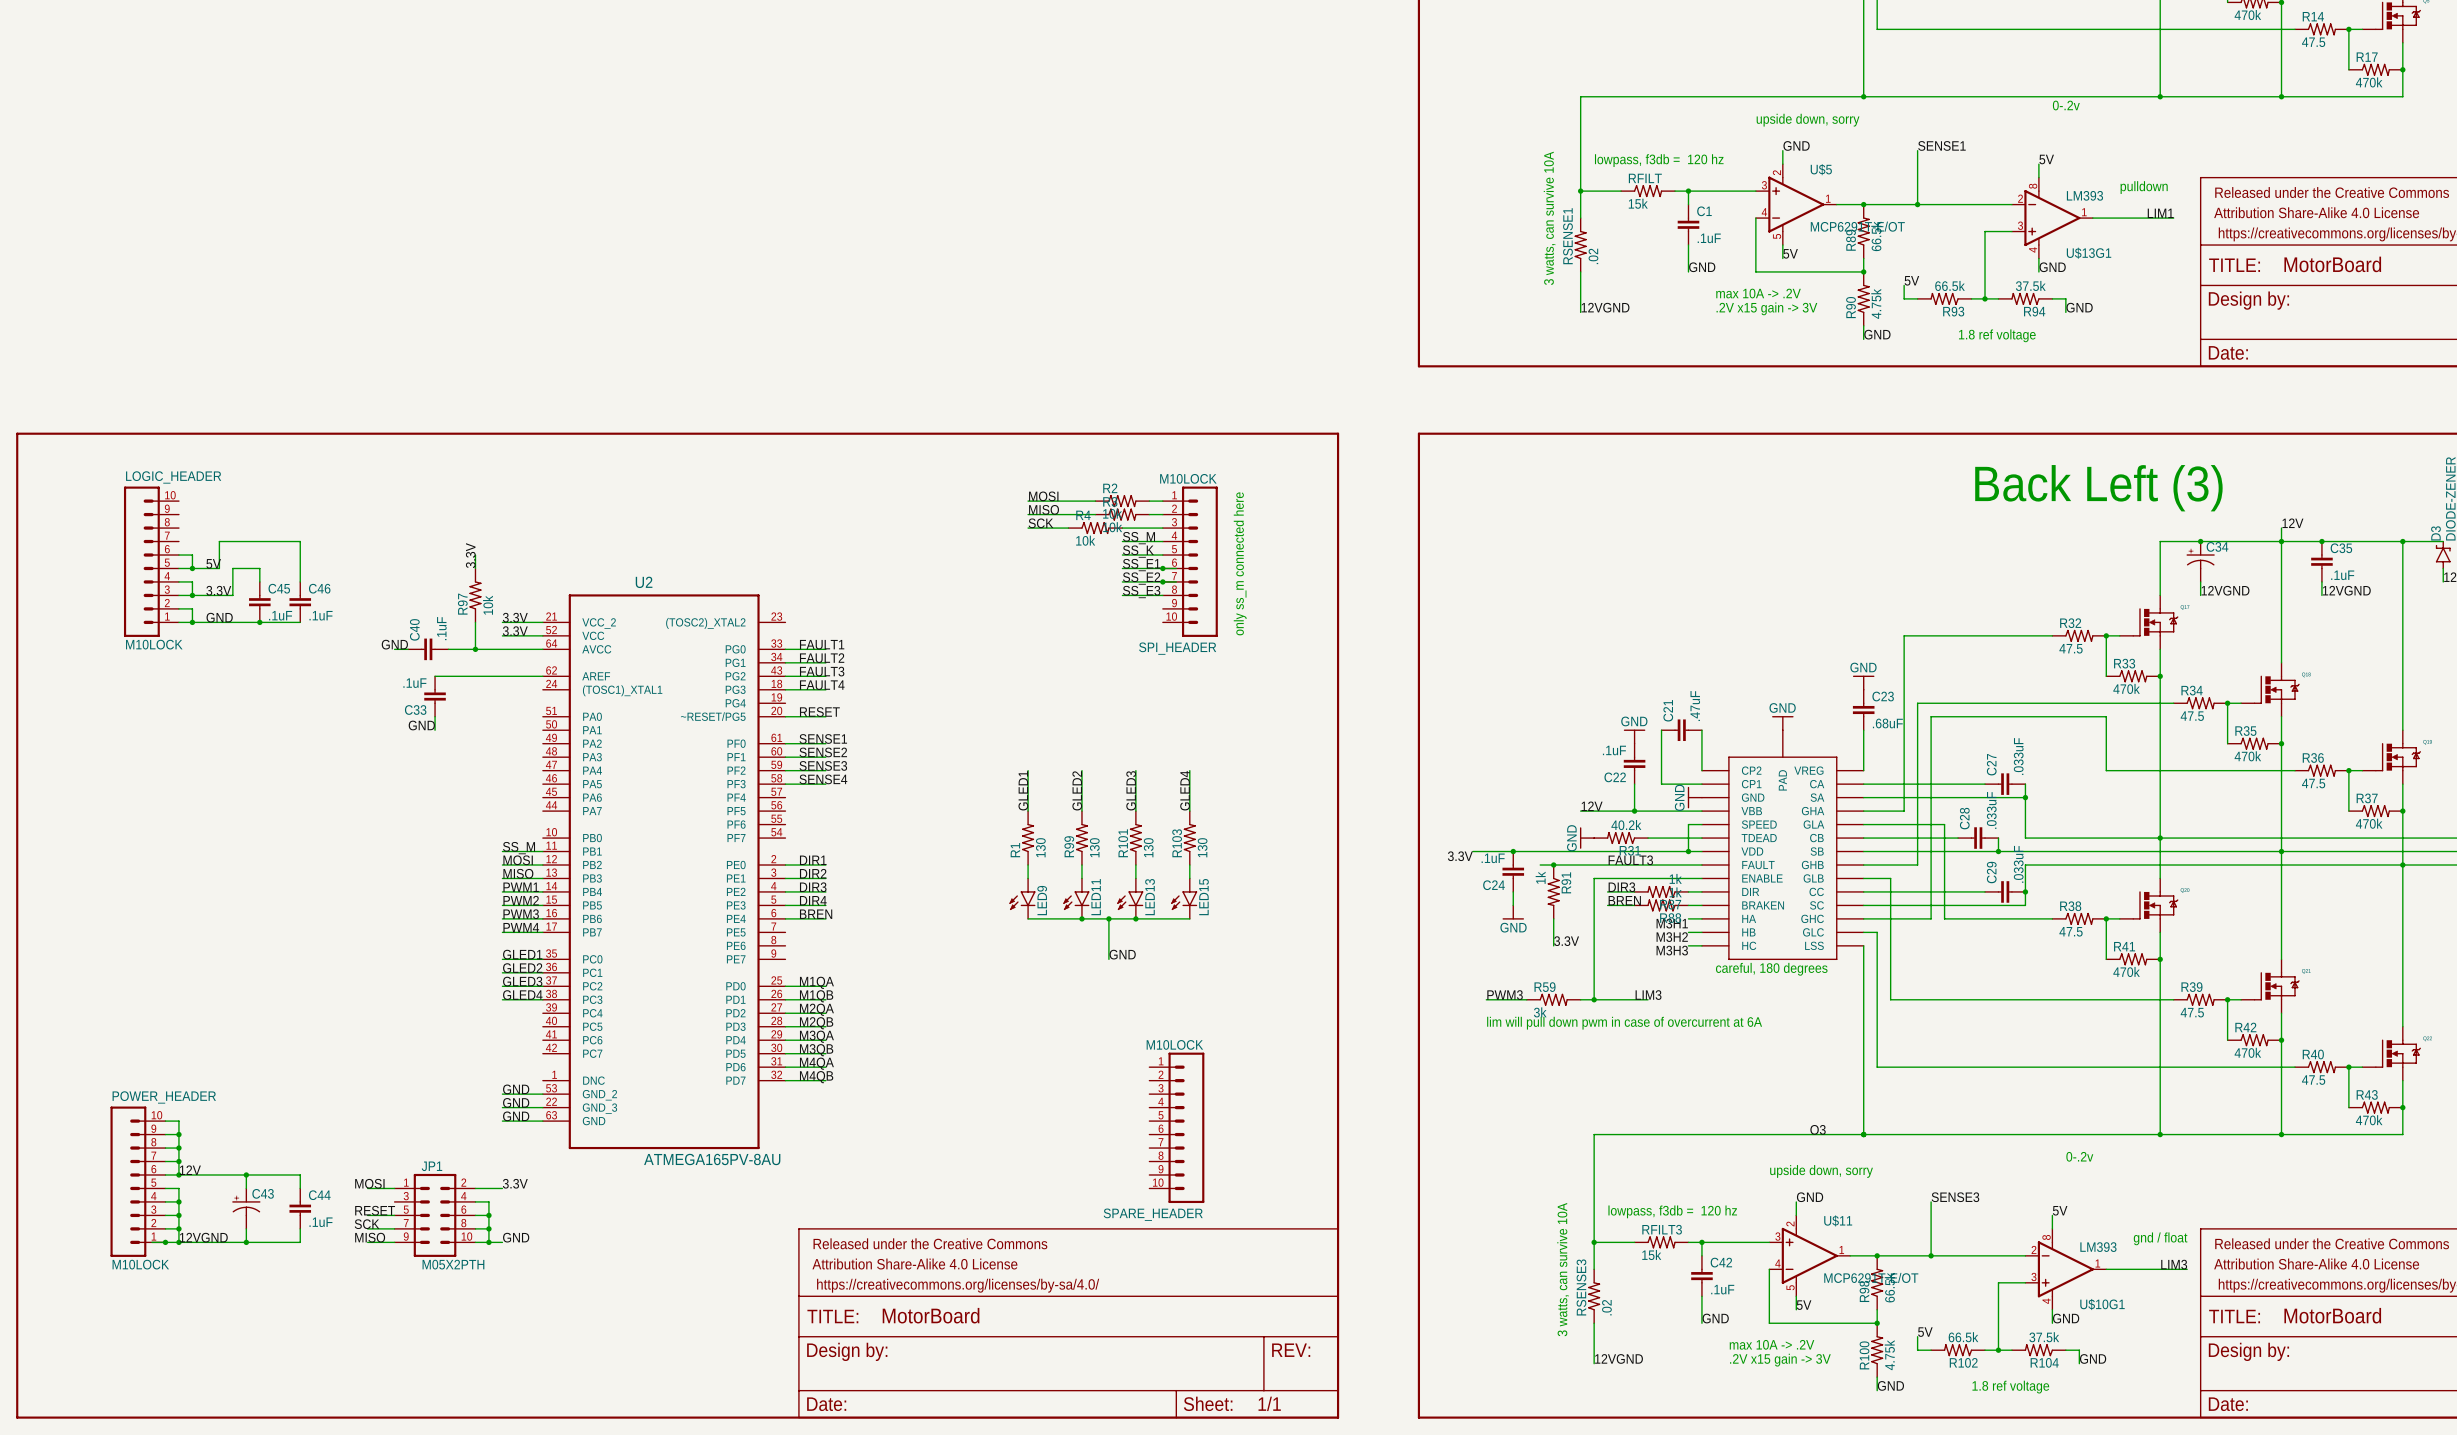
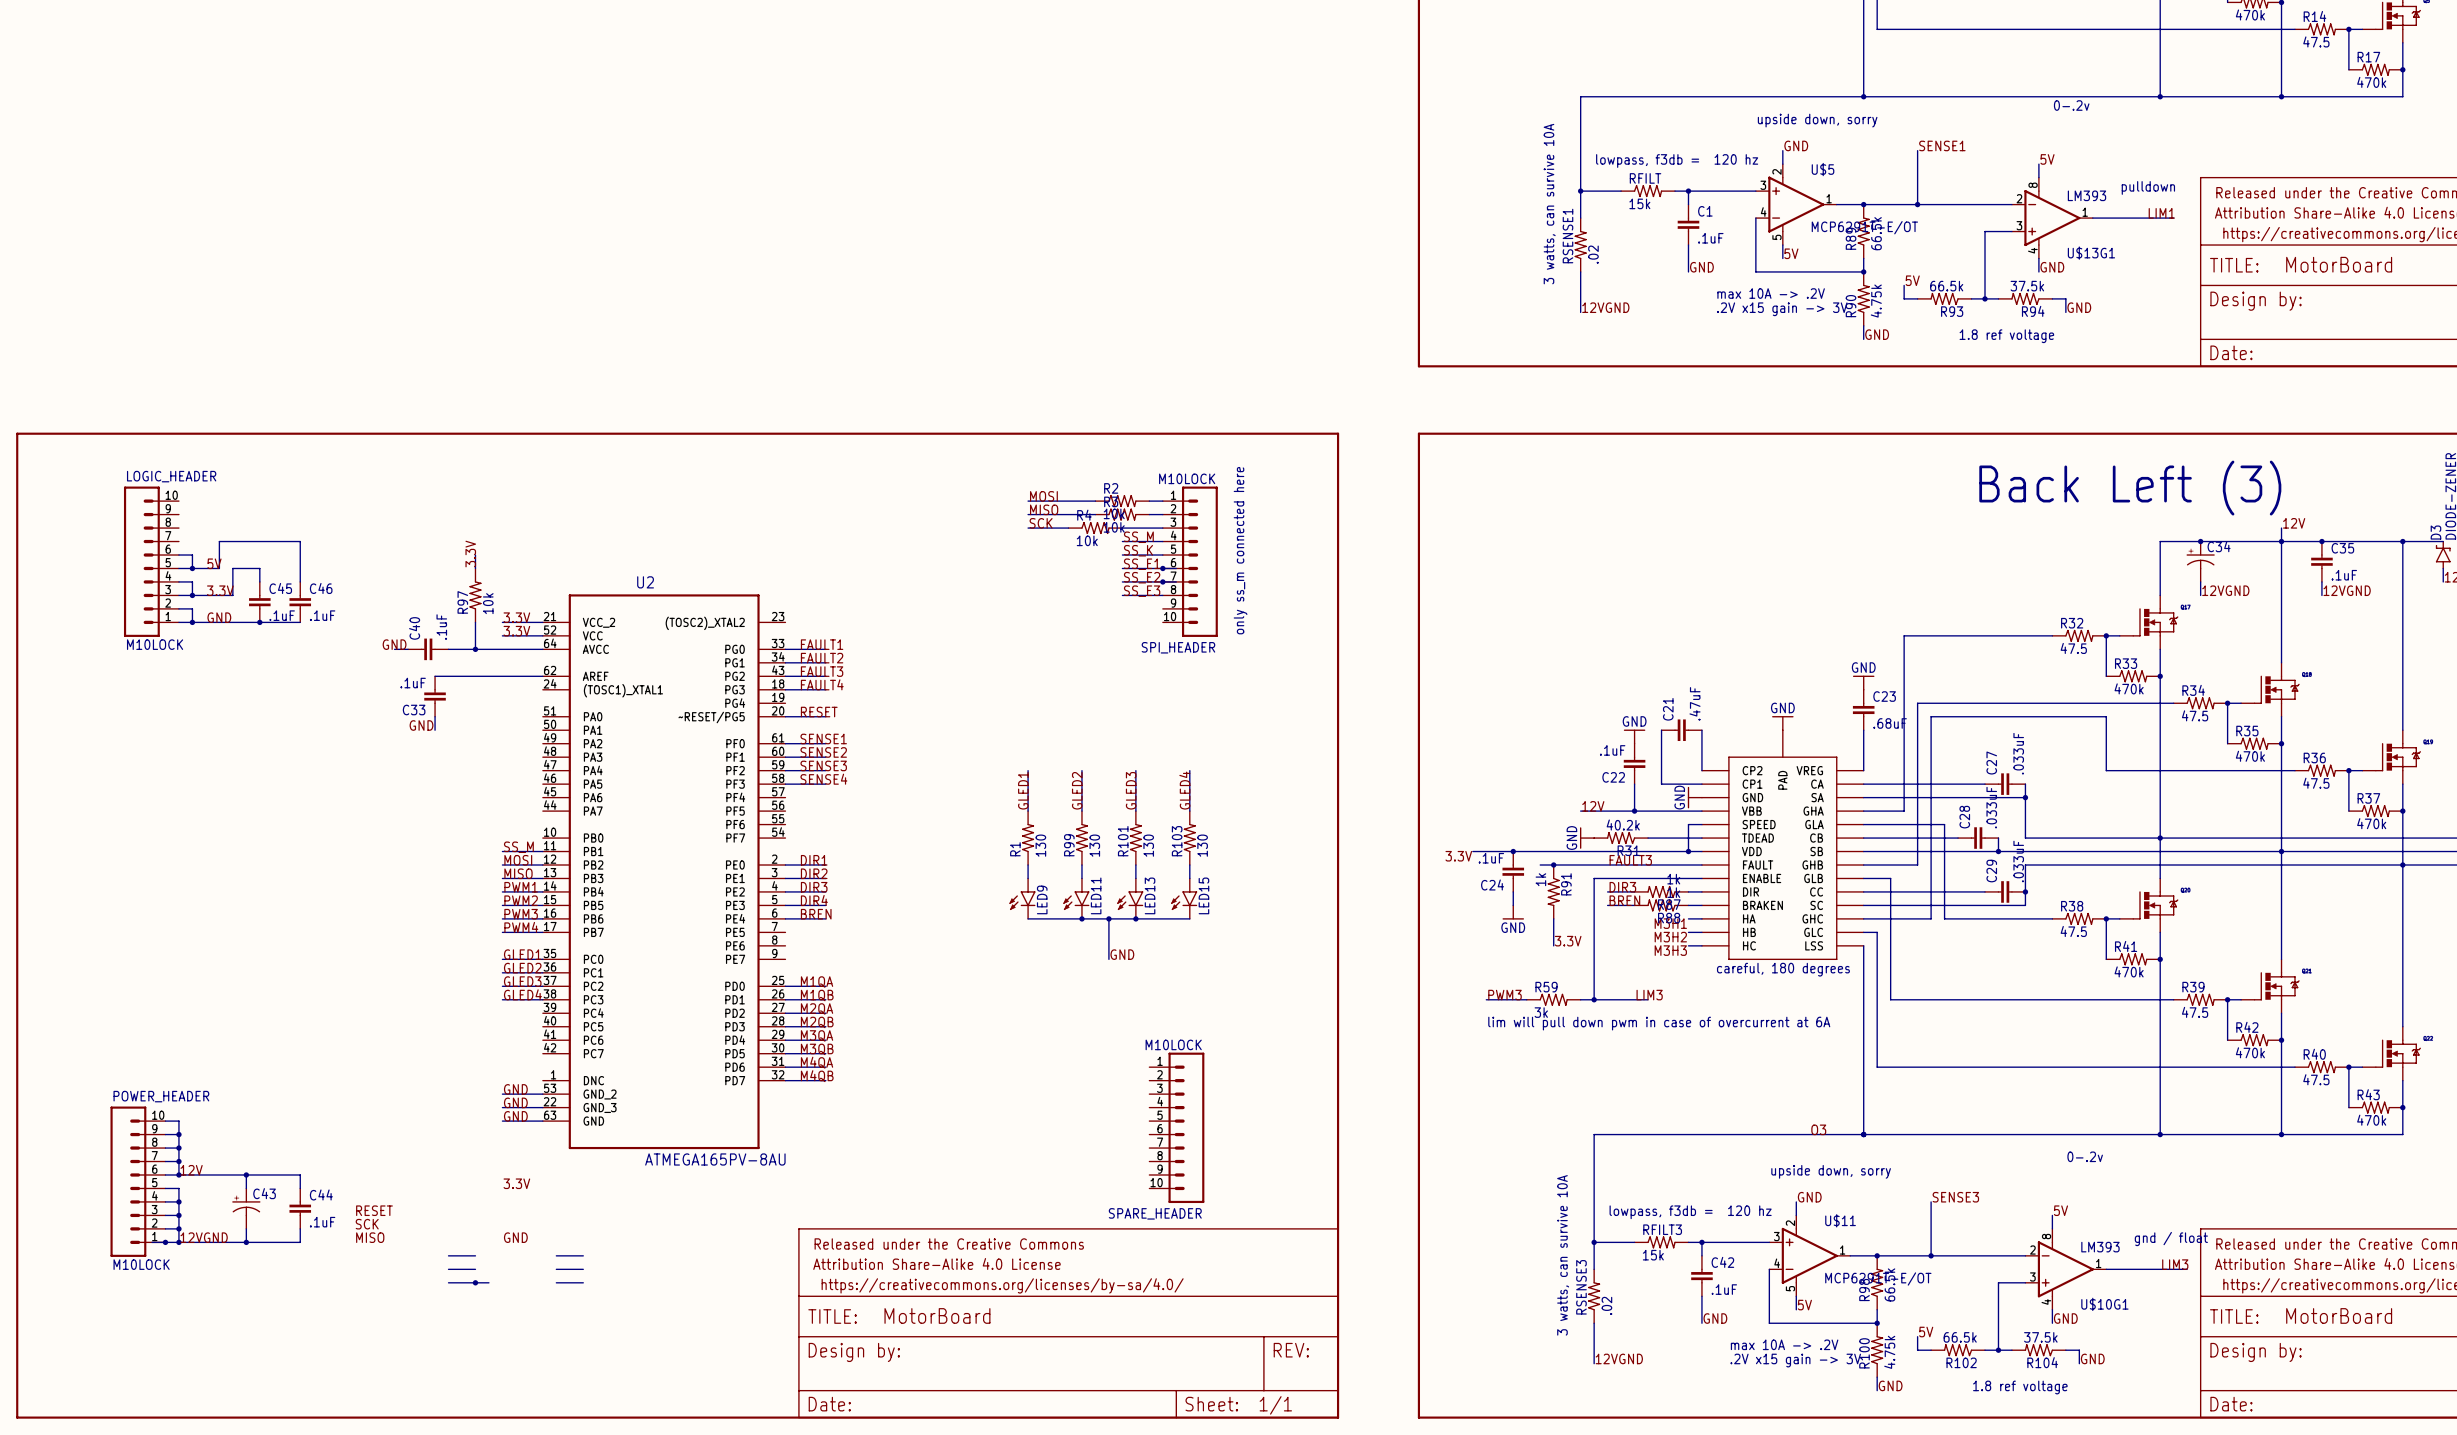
label: MOSI (369, 1183) -> none
wire: (367, 1188) (394, 1188) -> none
wire: (475, 1188) (502, 1188) -> (556, 1255) (583, 1255)
wire: (475, 1201) (488, 1201) (488, 1242) -> none
wire: (367, 1215) (394, 1215) -> none
JP1: M05X2PTH (435, 1215) -> none
wire: (475, 1215) (488, 1215) -> none
junction: (488, 1215) -> none
wire: (367, 1228) (394, 1228) -> (448, 1255) (475, 1255)
wire: (475, 1228) (488, 1228) -> none
junction: (488, 1228) -> none
wire: (367, 1242) (394, 1242) -> (448, 1269) (475, 1269)
wire: (475, 1242) (502, 1242) -> (556, 1269) (583, 1269)
junction: (488, 1242) -> none
wire: none -> (448, 1282) (488, 1282)
junction: none -> (475, 1282)
wire: none -> (556, 1282) (583, 1282)

